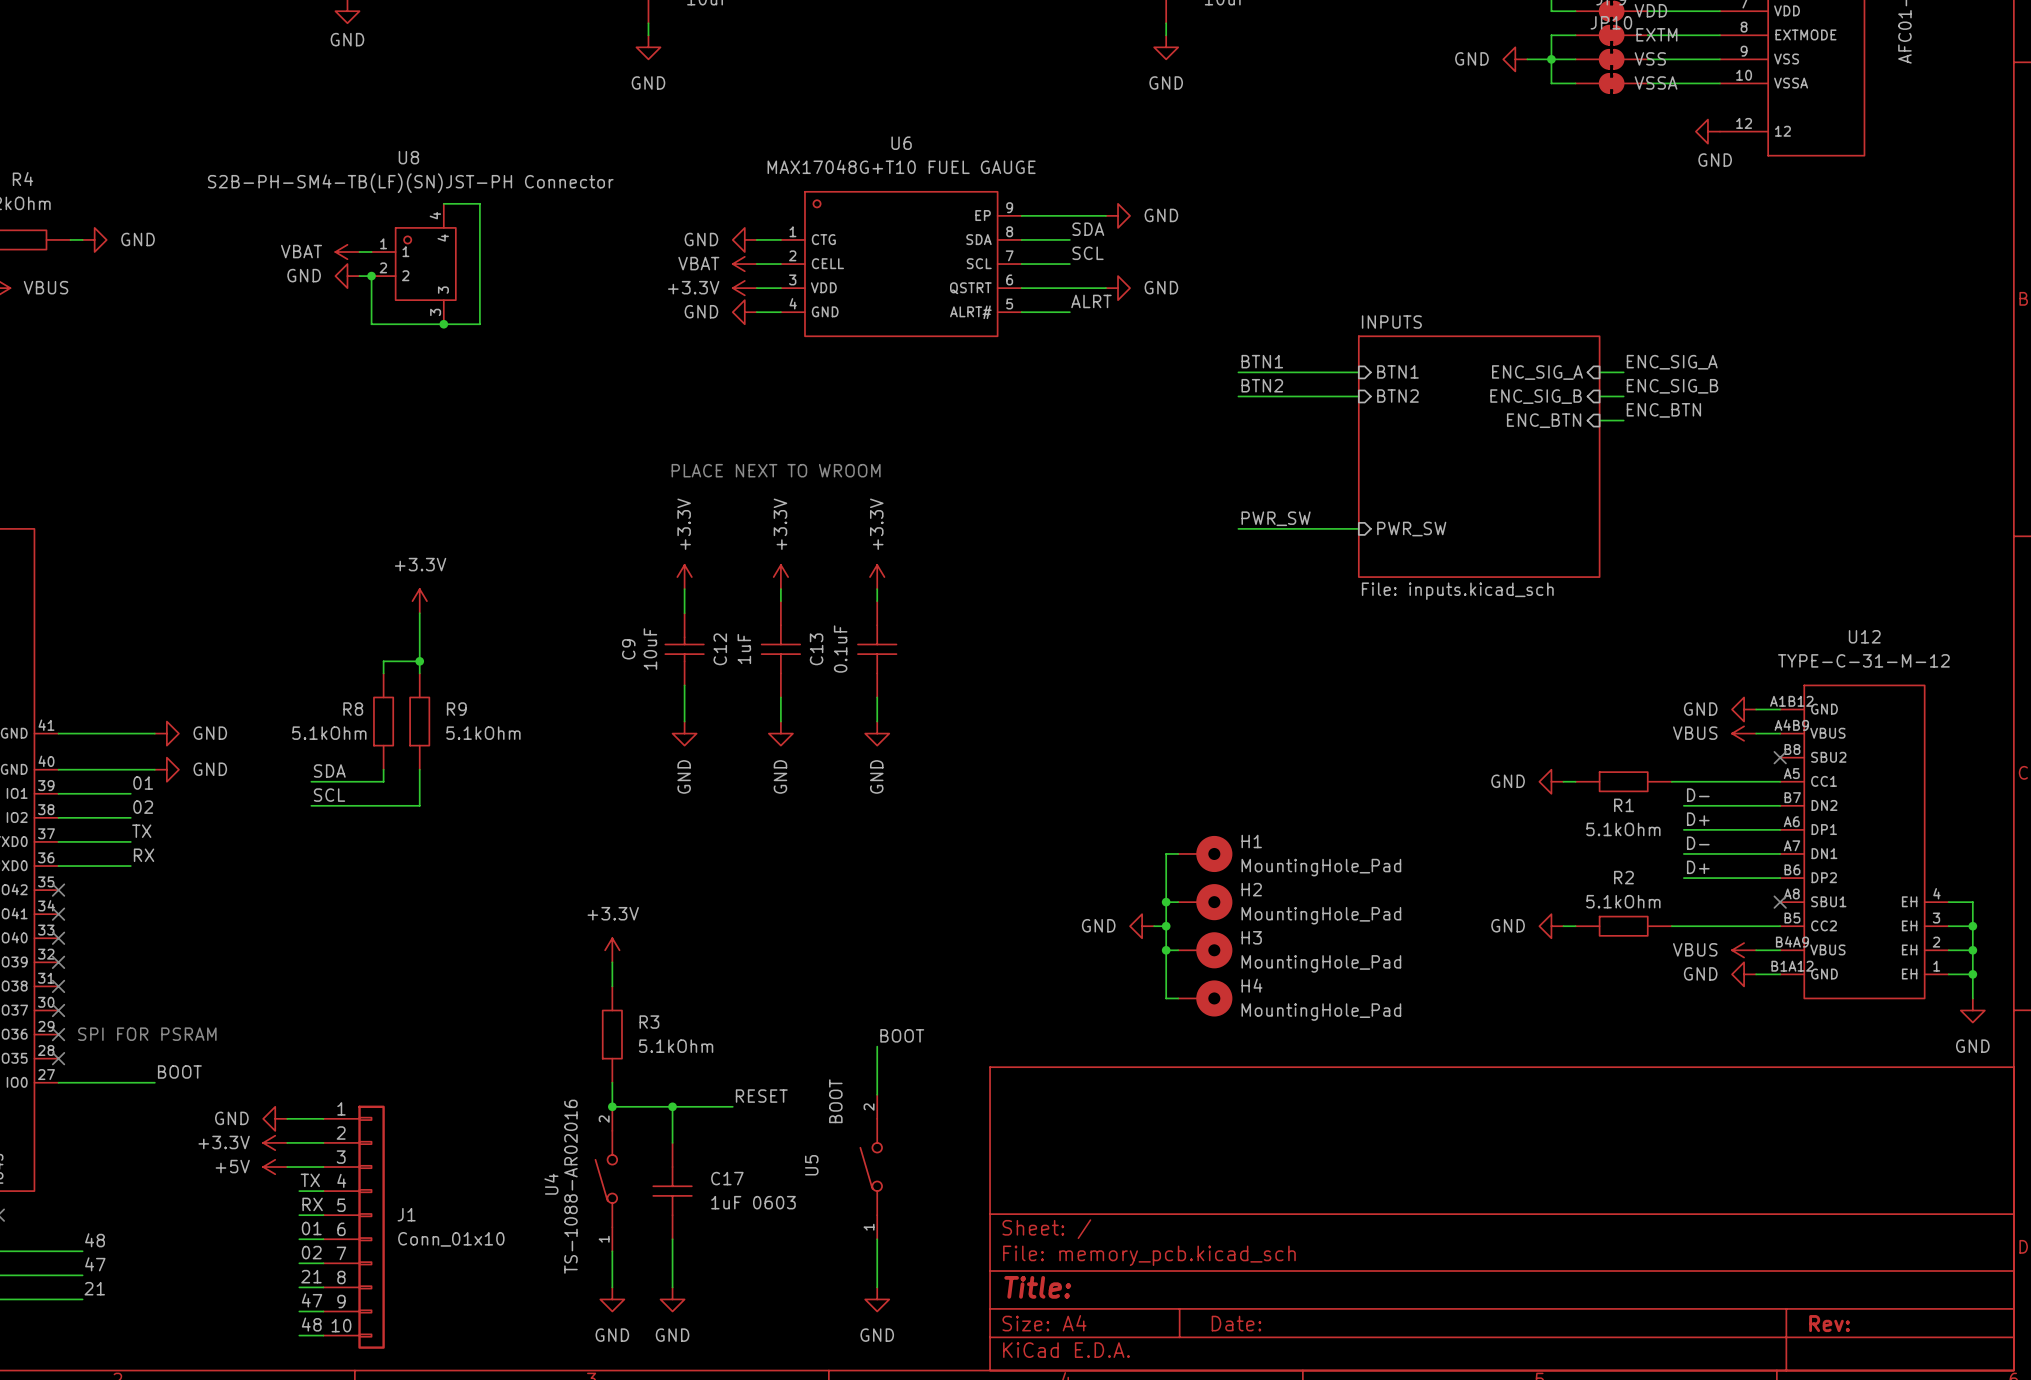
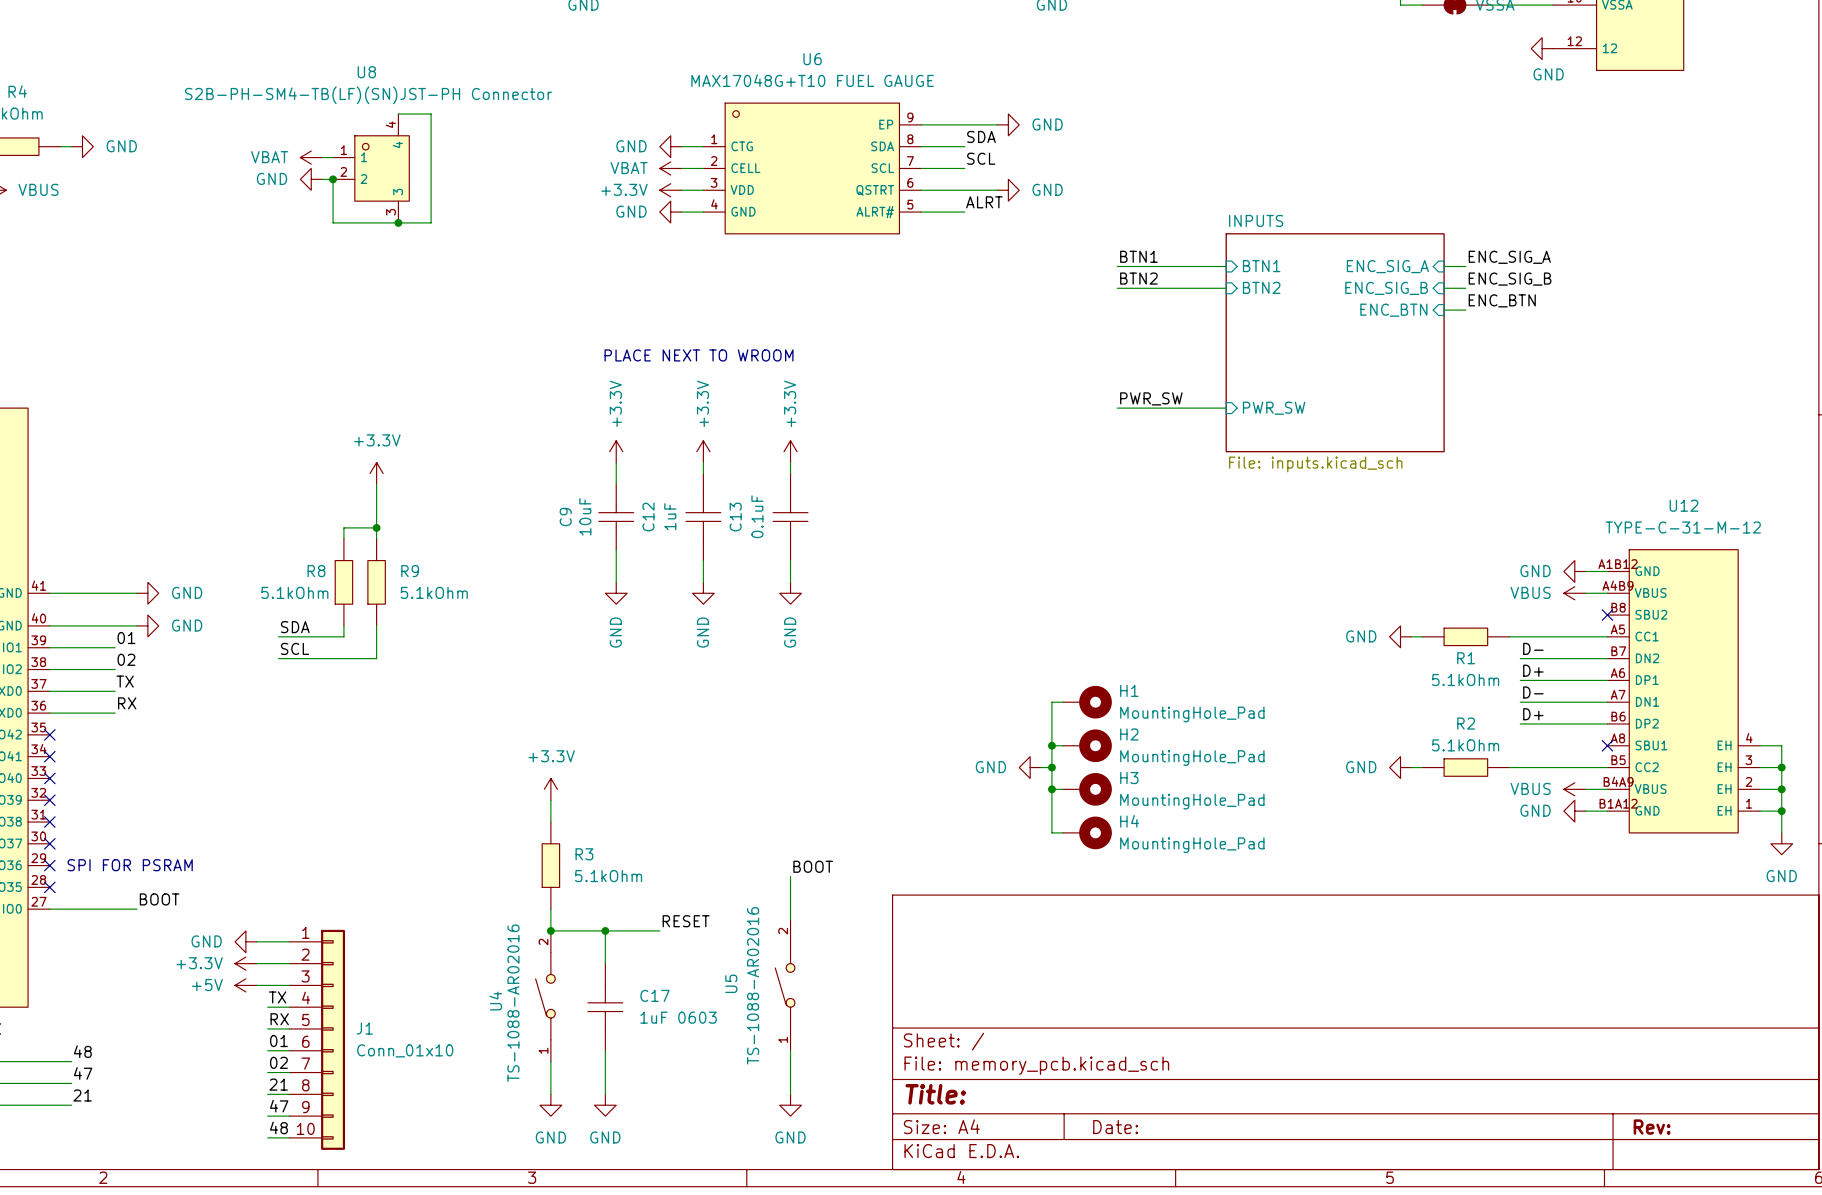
U5 value: BOOT (835, 1101) -> TS-1088-AR02016 (753, 985)

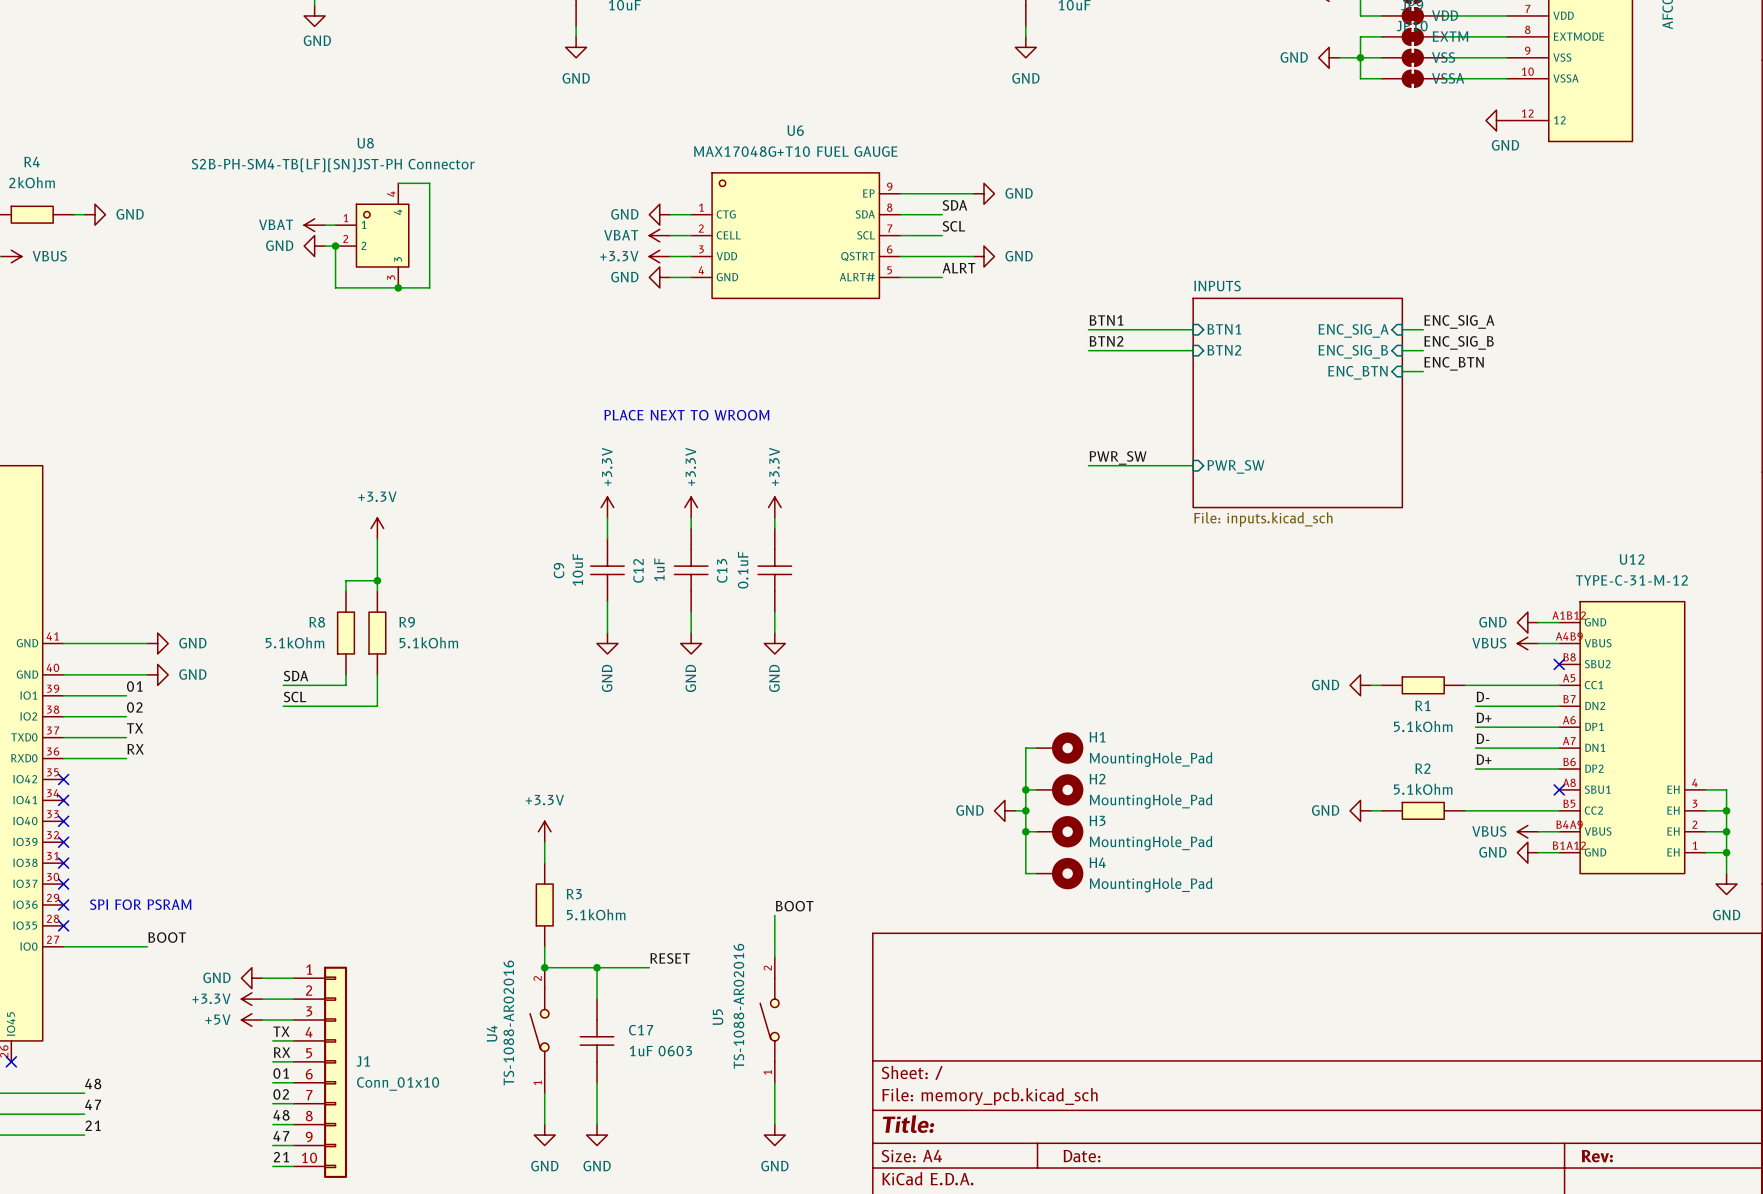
label: 21 (278, 1084) -> 48 (281, 1115)
label: 48 (278, 1127) -> 21 (281, 1157)

